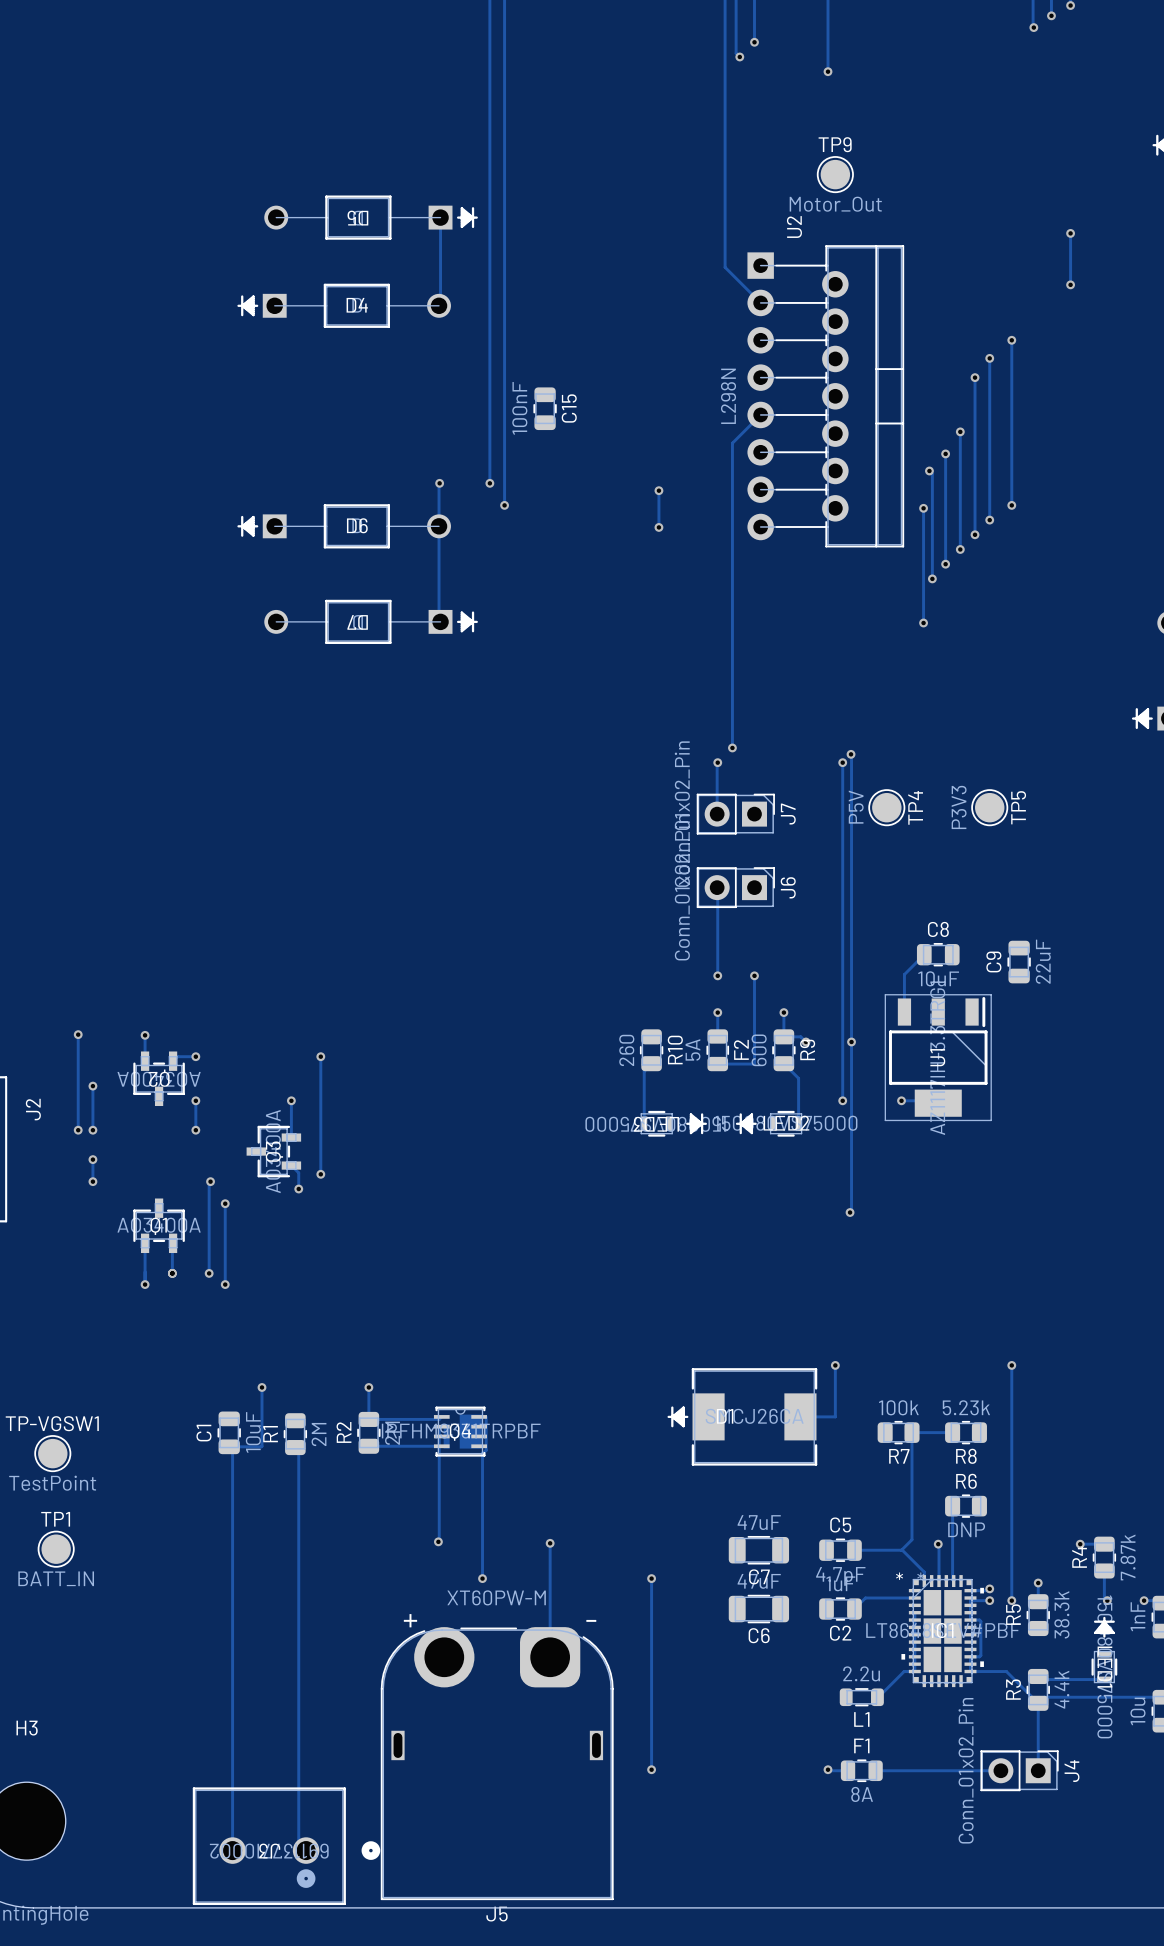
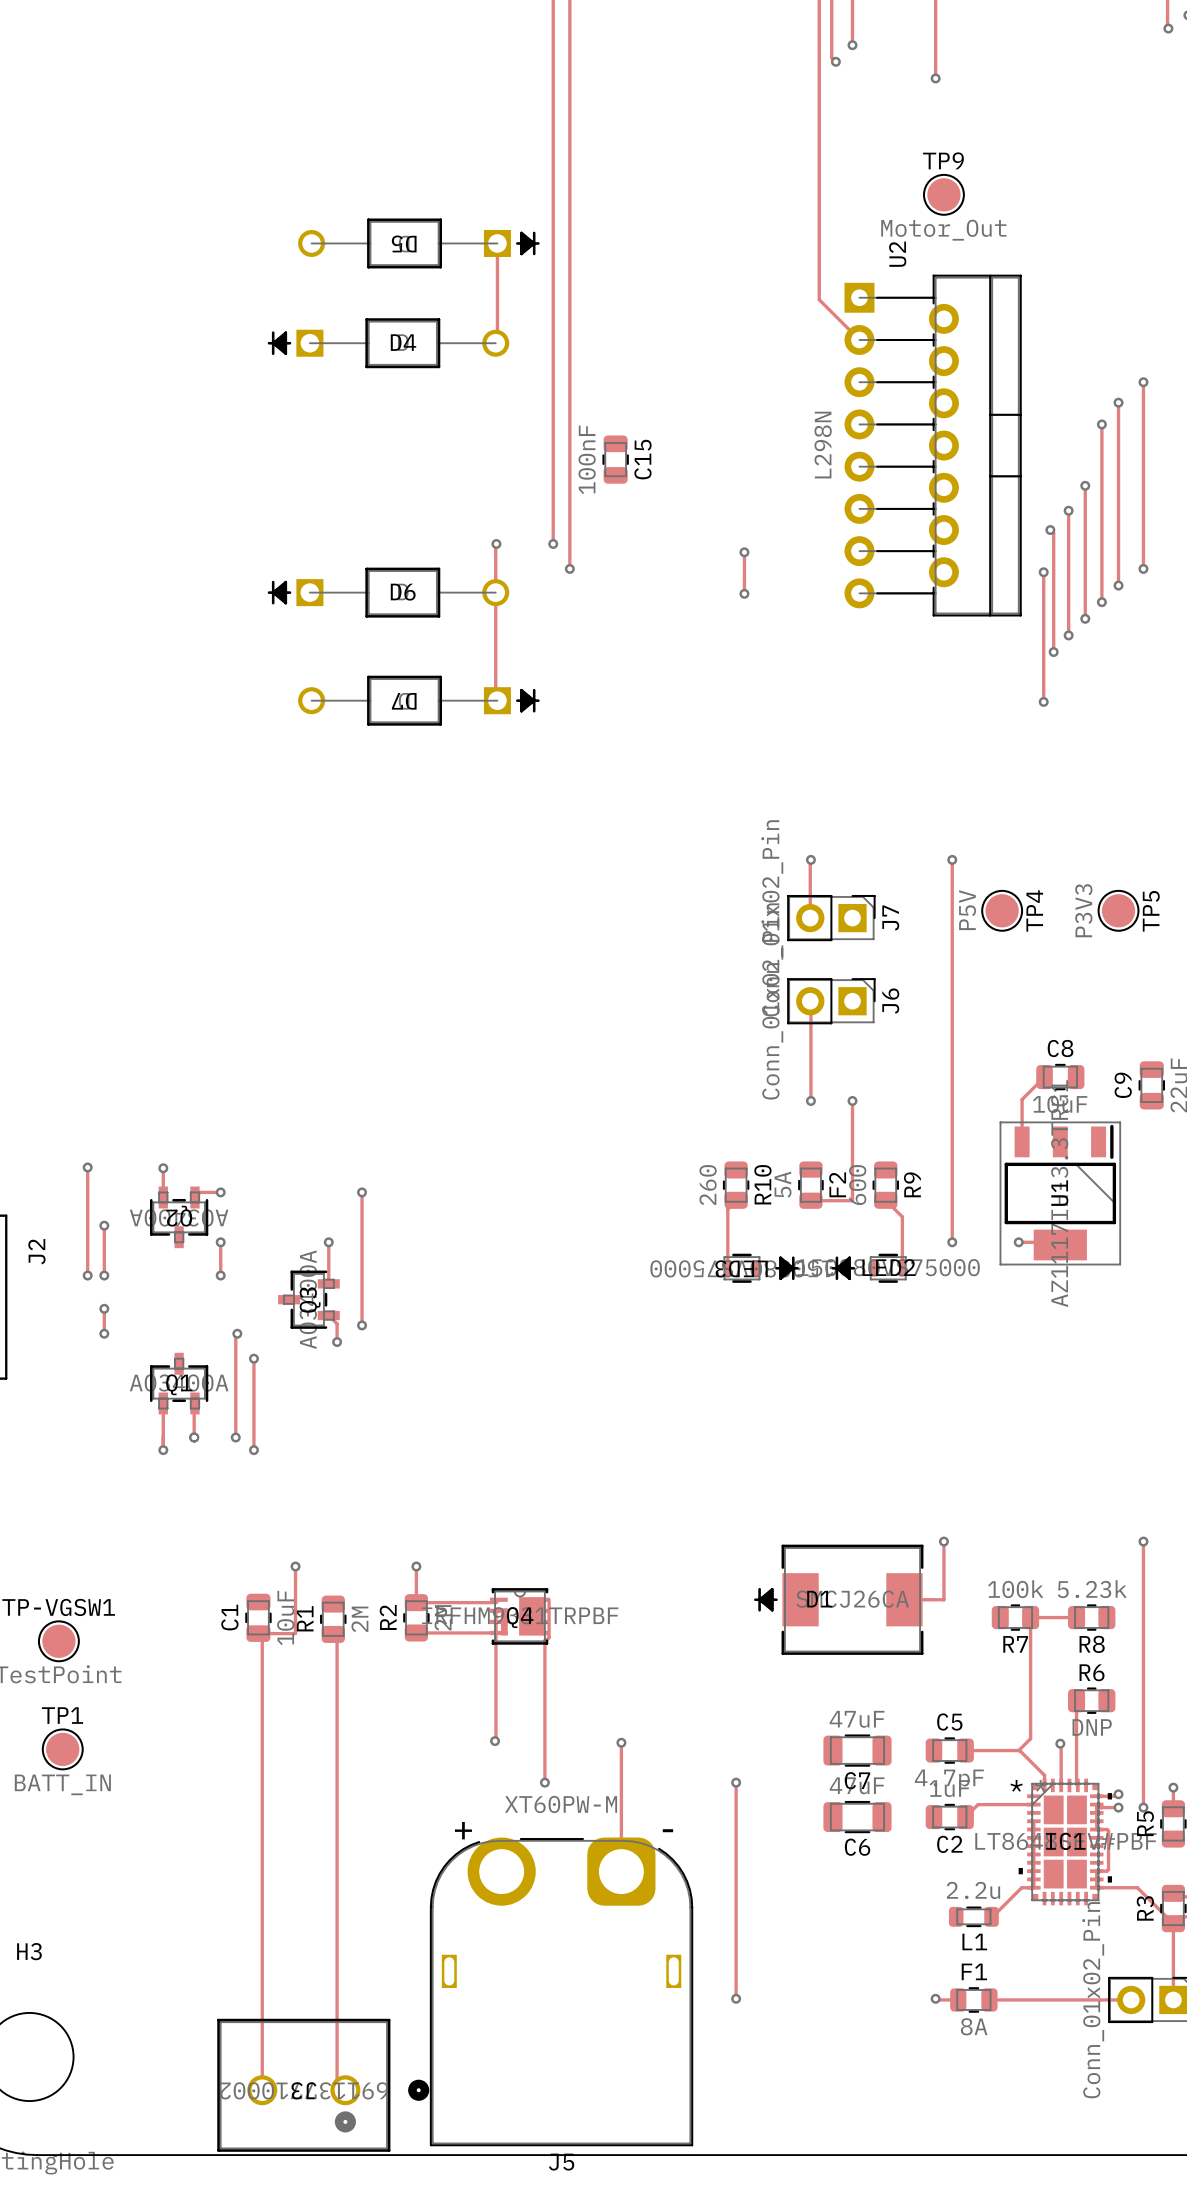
track: (760, 414) (732, 443) (732, 747) -> none
via: (732, 747) -> none
track: (851, 754) (850, 1212) -> none
via: (851, 754) -> none
track: (717, 1012) (717, 1036) -> none
via: (717, 1012) -> none
track: (783, 1012) (783, 1036) (800, 1036) (805, 1041) -> none
via: (783, 1012) -> none
via: (805, 1041) -> none
via: (851, 1041) -> none
via: (850, 1212) -> none

